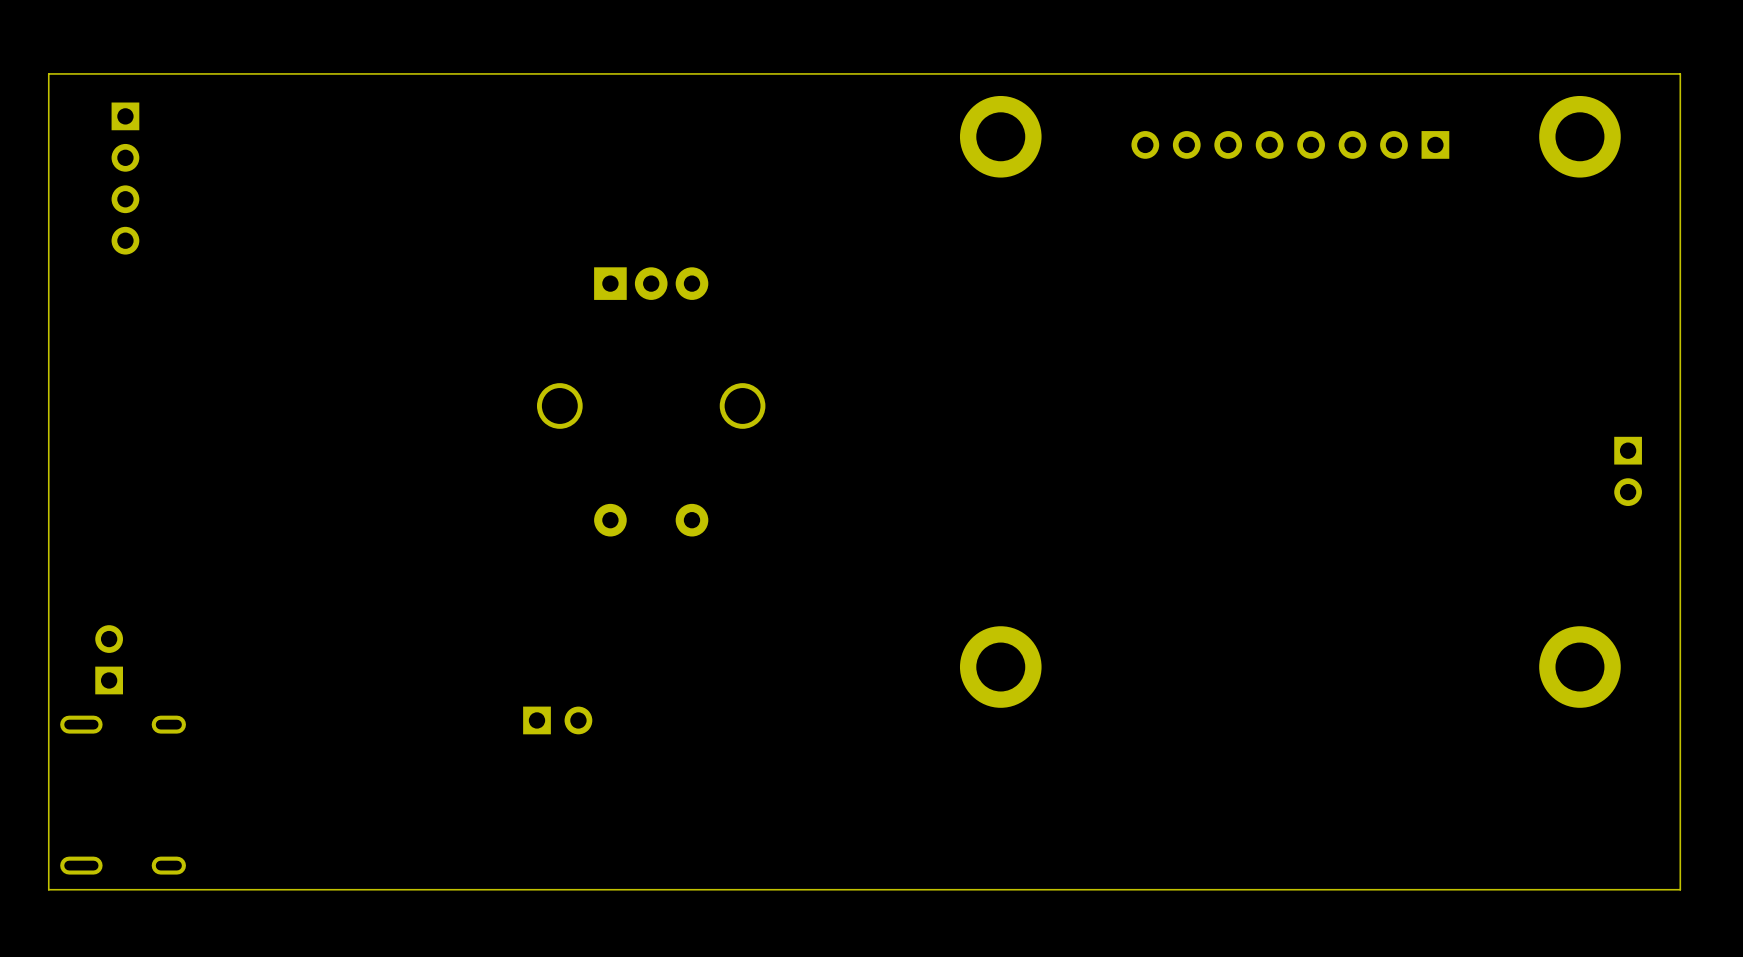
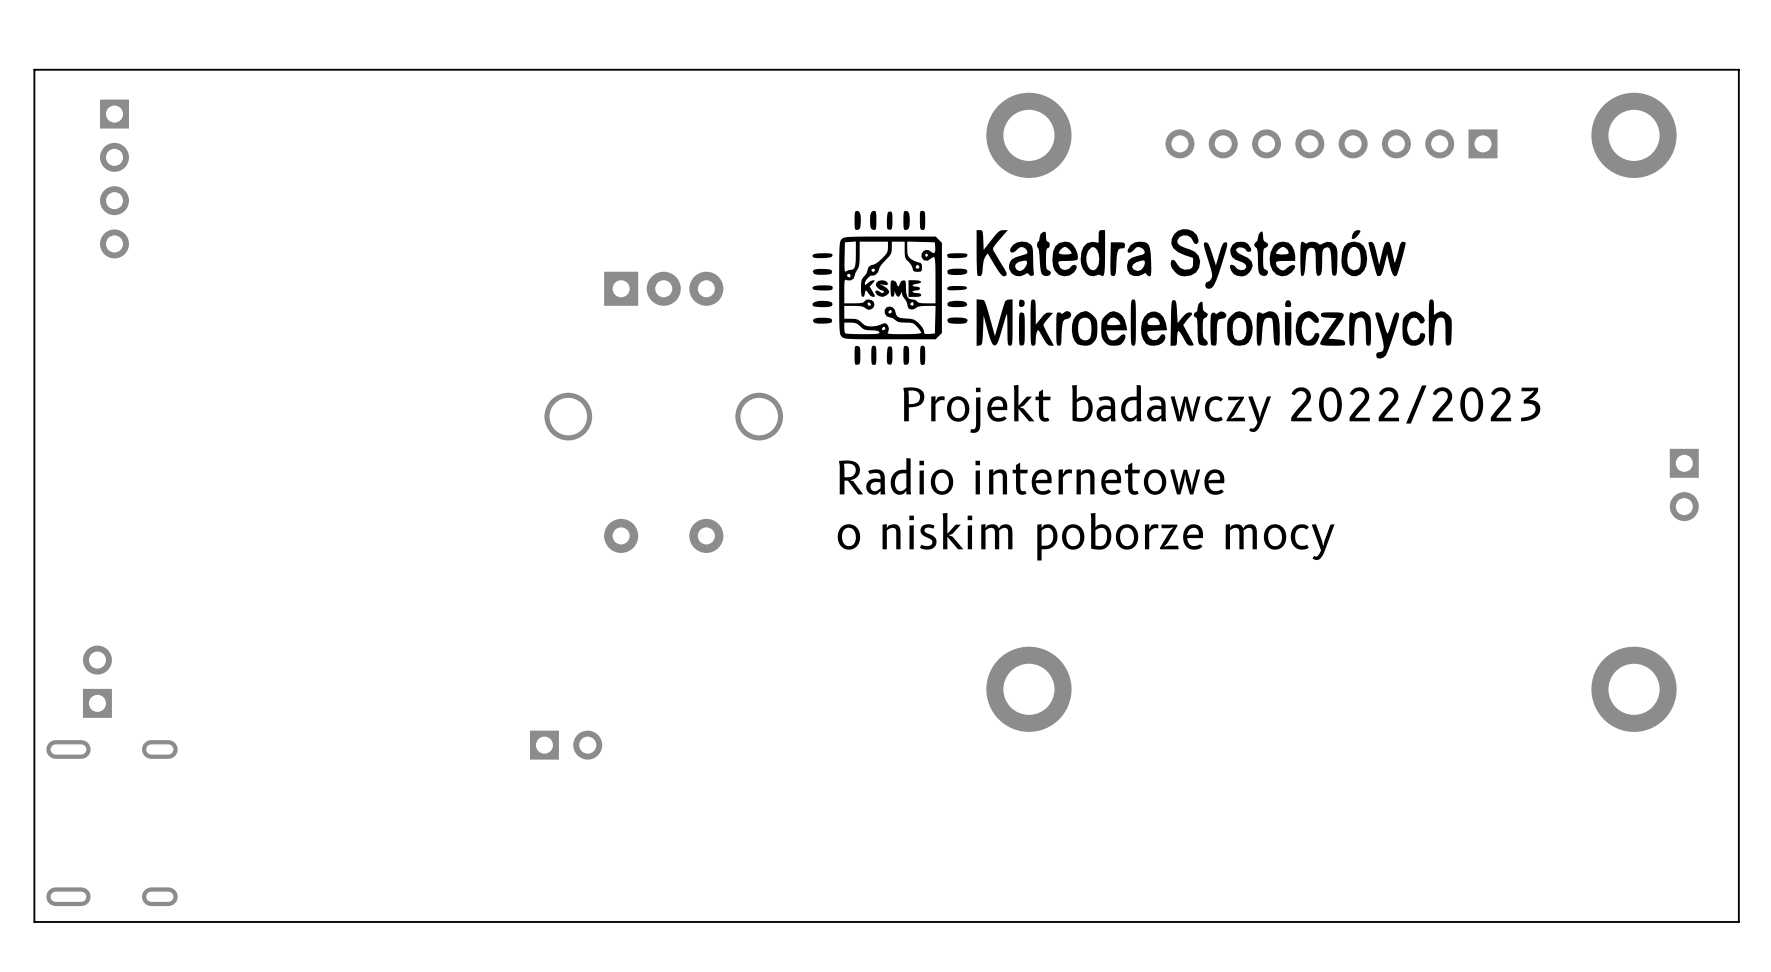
drawing: none -> [812, 210, 1452, 365]
text: none -> Projekt badawczy 2022/2023 (1221, 408)
text: none -> Radio internetowe (1031, 476)
text: none -> o niskim poborze mocy (1086, 536)

